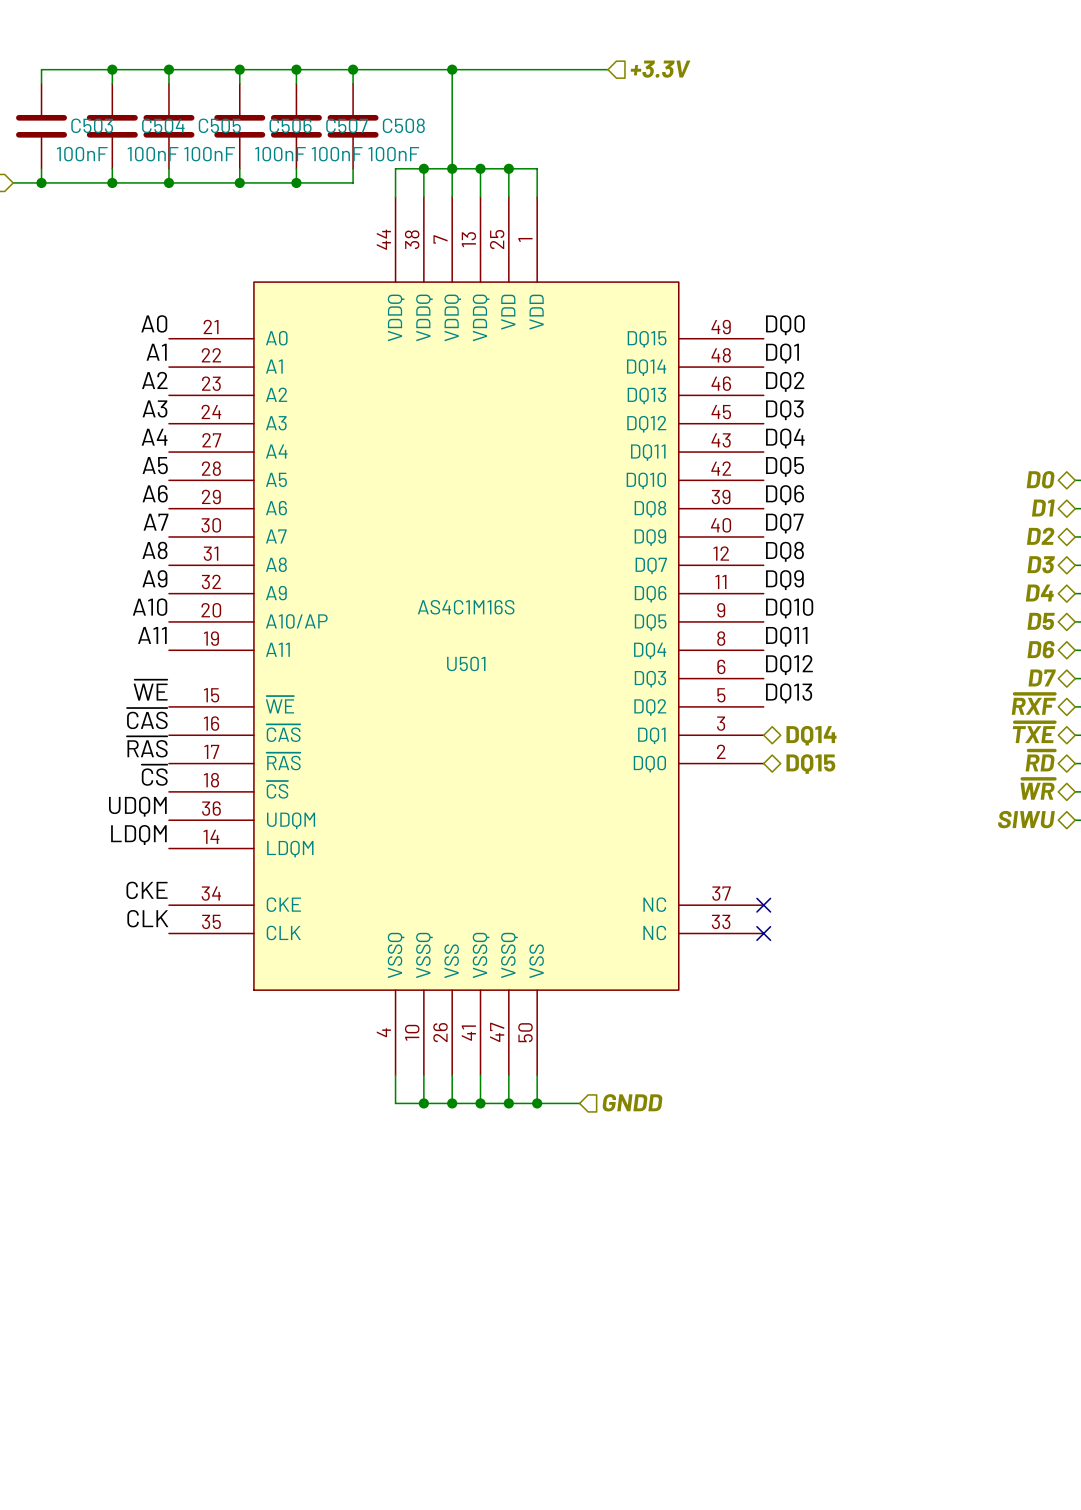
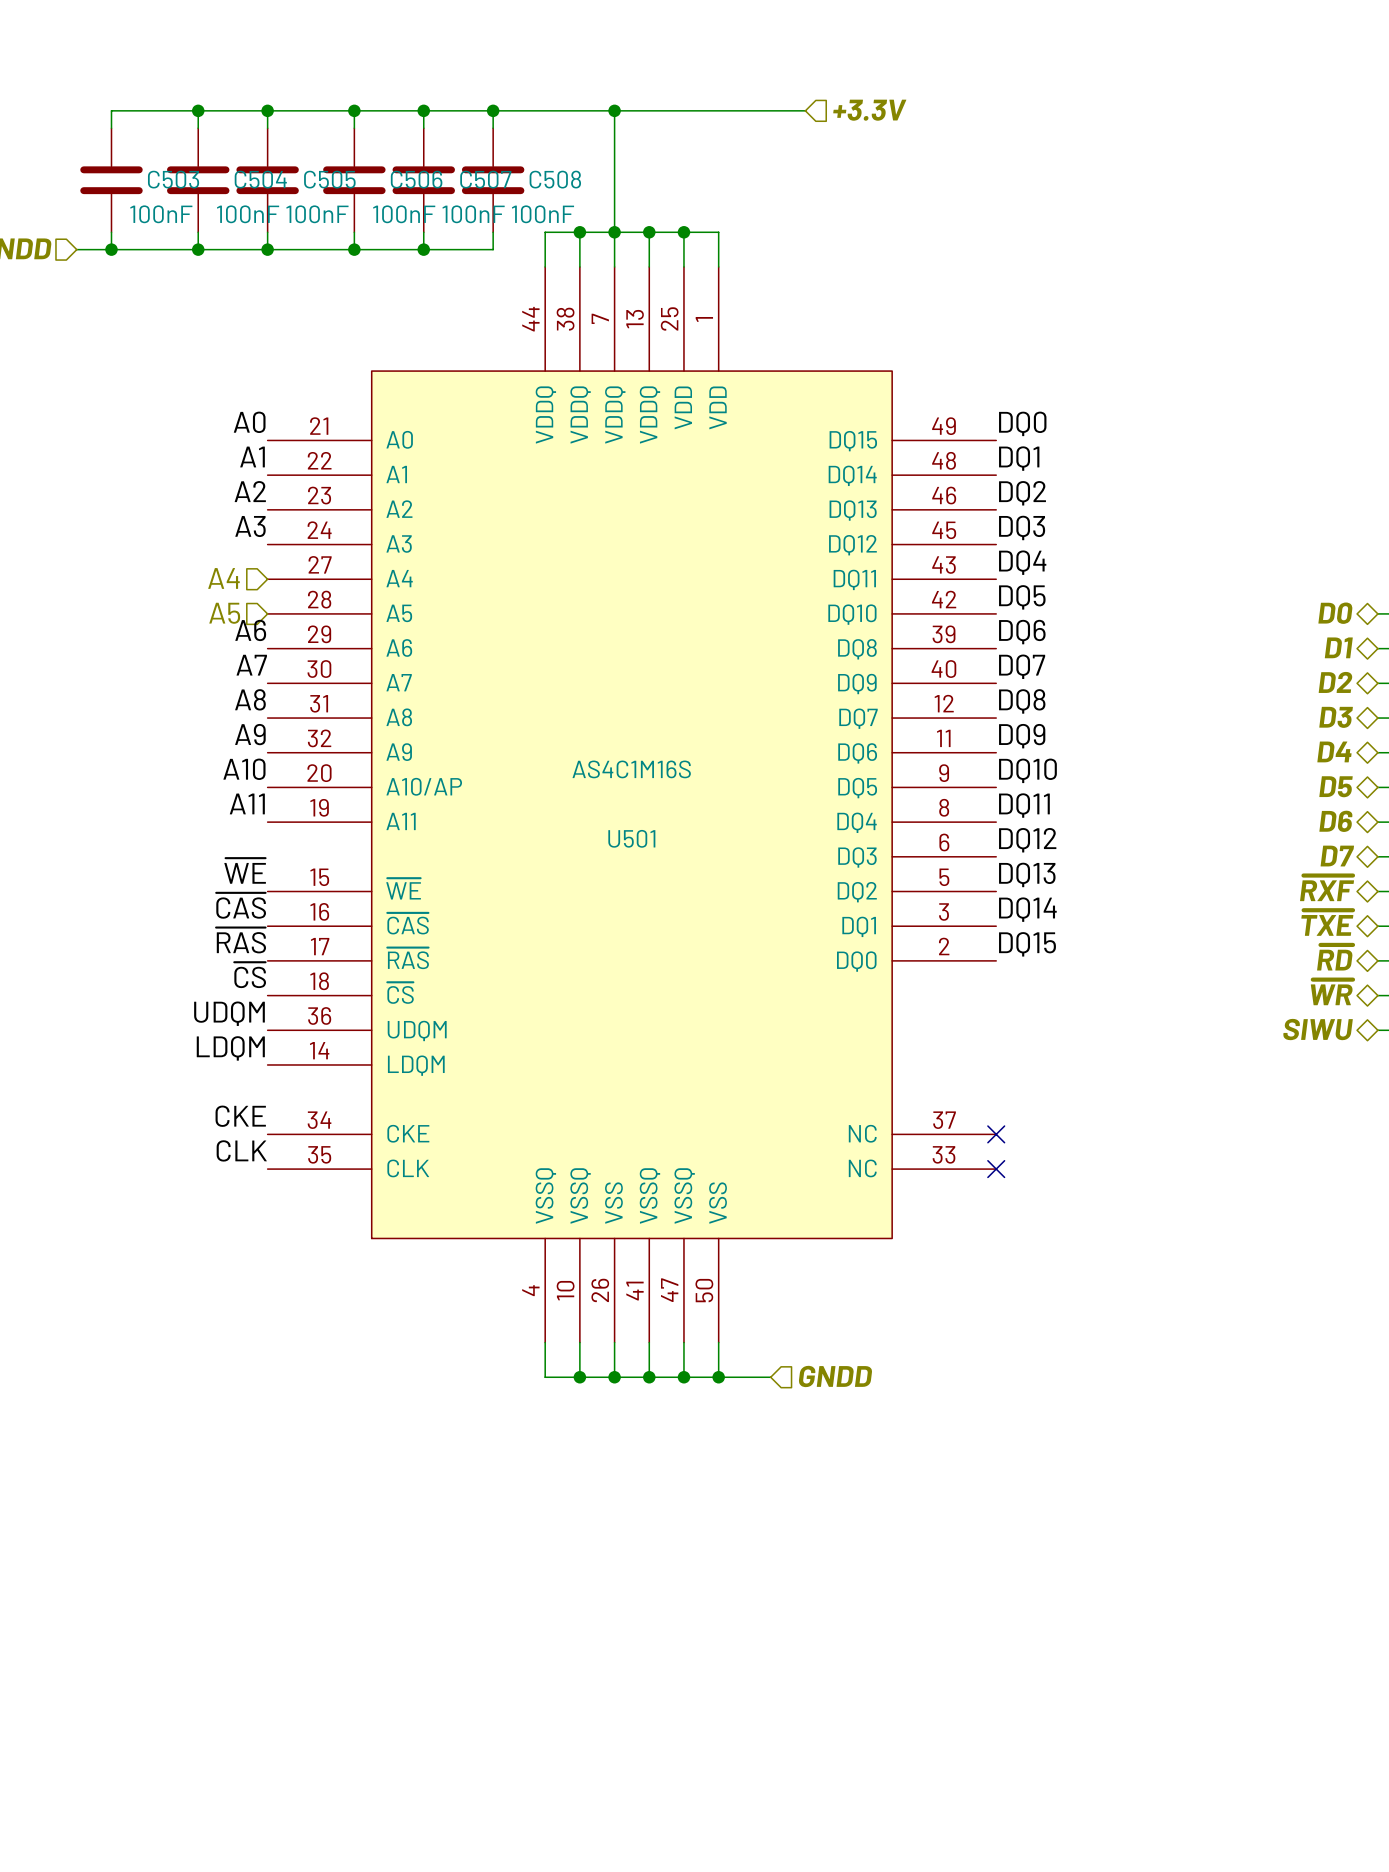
label: A4 (154, 437) -> none
hierarchical label: none -> A4 (223, 578)
label: A5 (155, 465) -> none
hierarchical label: none -> A5 (224, 613)
label: none -> DQ14 (1027, 909)
hierarchical label: DQ14 (811, 735) -> none
label: none -> DQ15 (1027, 944)
hierarchical label: DQ15 (810, 764) -> none

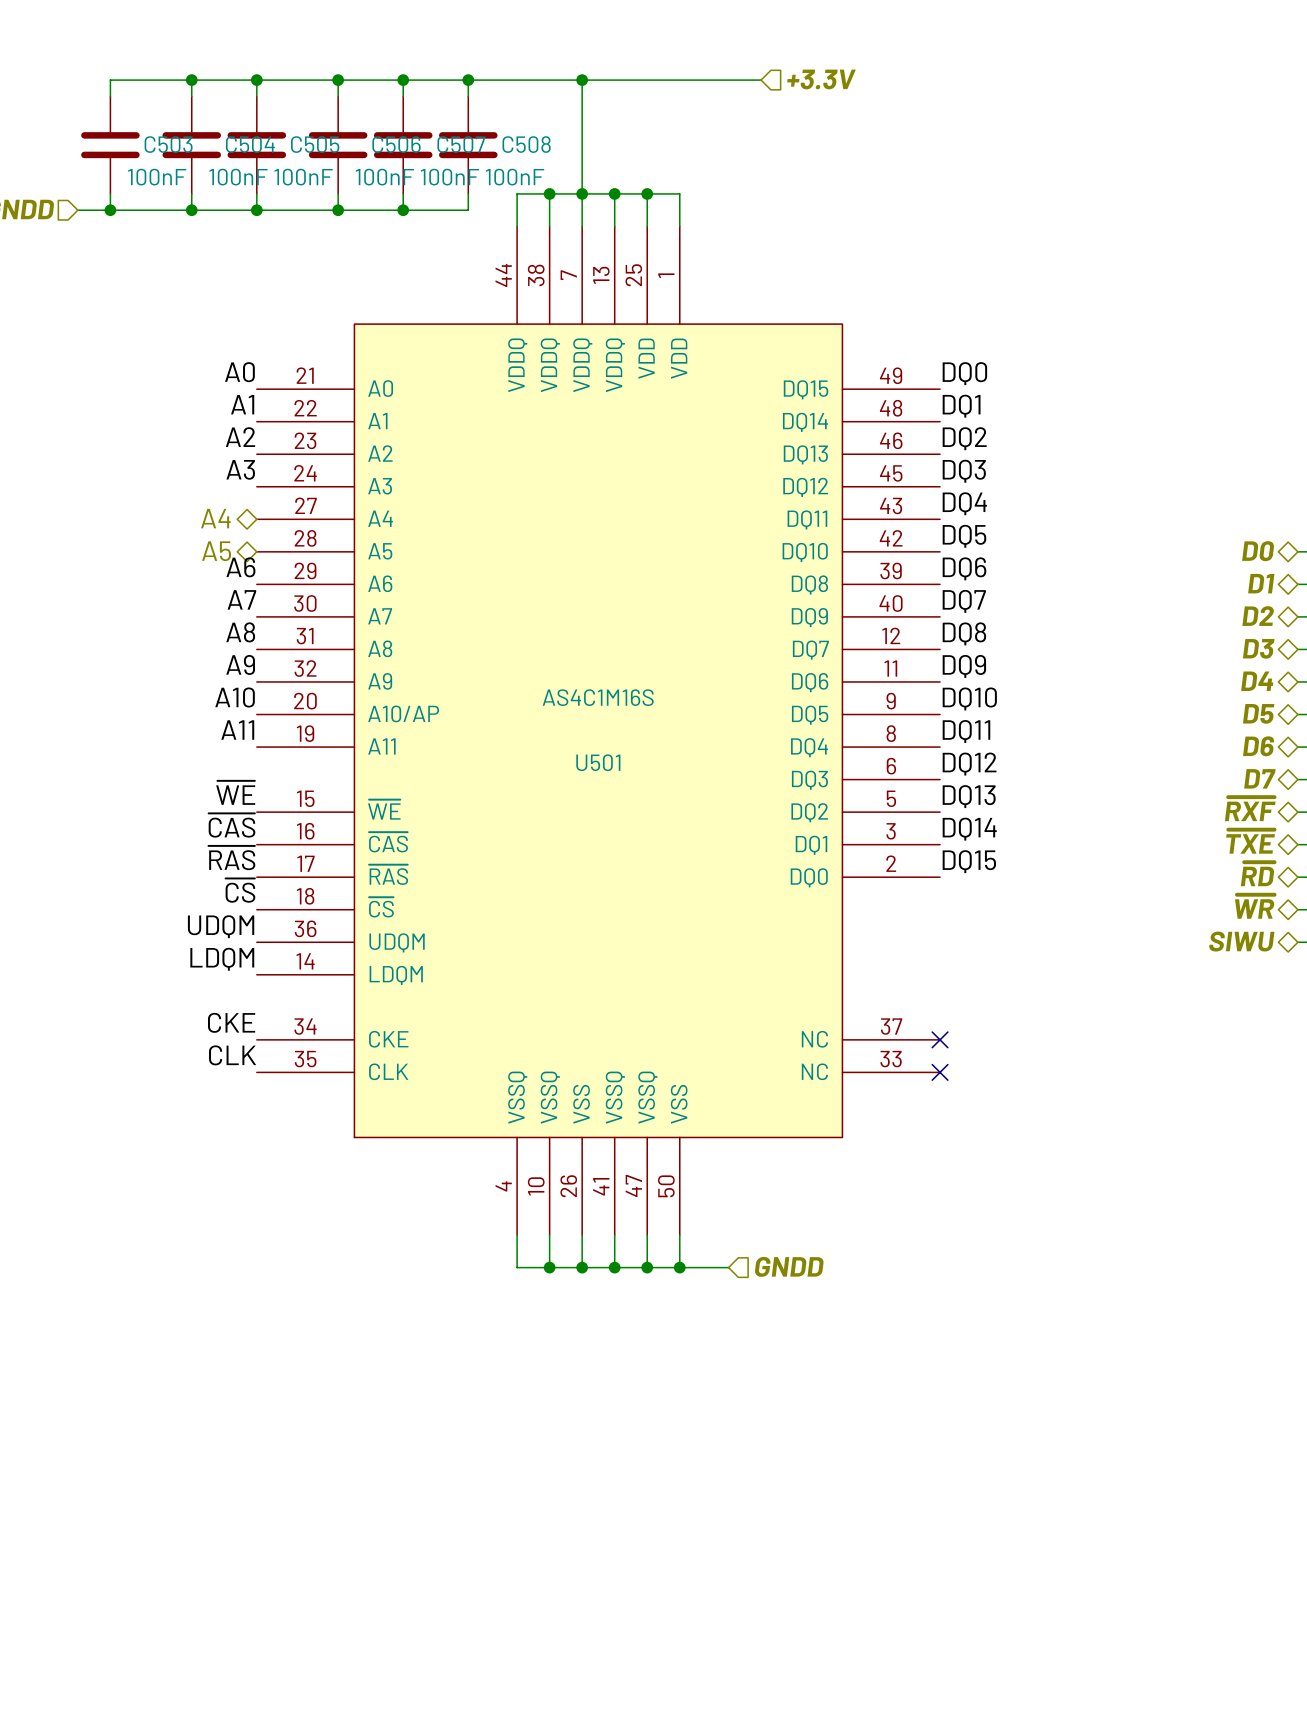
hierarchical label shape: input (223, 578) -> bidirectional (215, 518)
hierarchical label shape: input (224, 613) -> bidirectional (216, 551)

